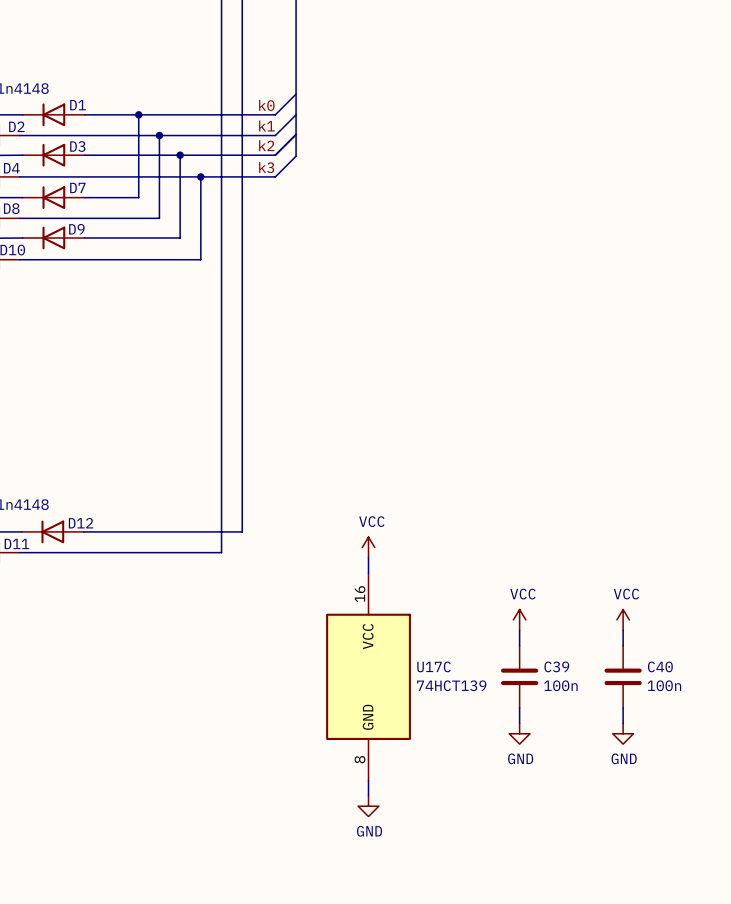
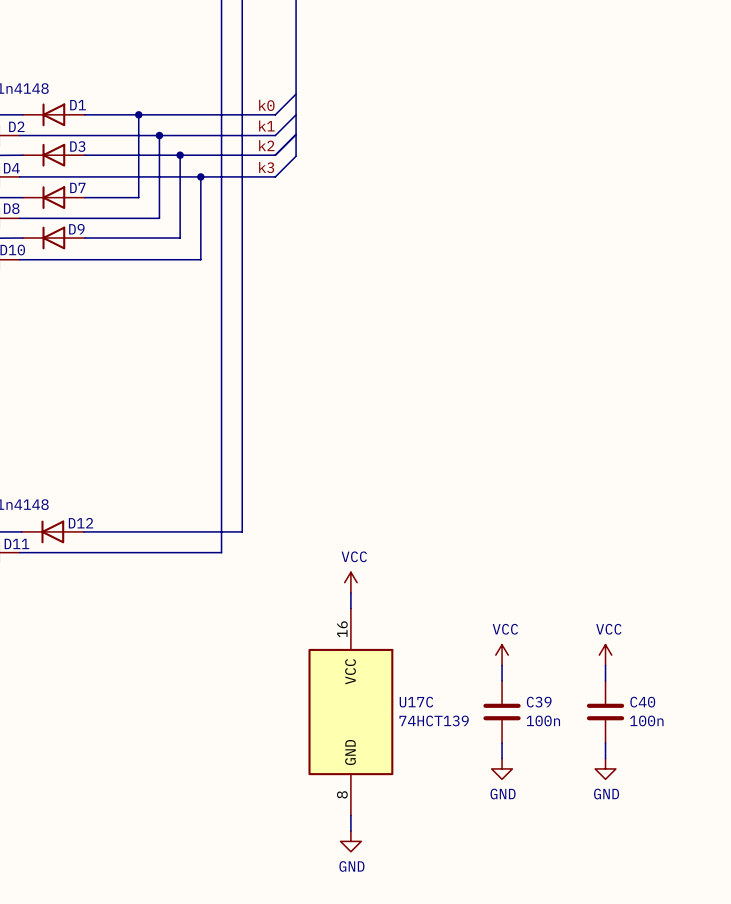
power symbol position: VCC (368, 547) -> VCC (350, 582)
wire: (368, 557) (368, 573) -> (350, 593) (350, 608)
power symbol position: VCC (519, 619) -> VCC (502, 655)
power symbol position: VCC (623, 619) -> VCC (605, 655)
wire: (519, 630) (519, 645) -> (502, 665) (502, 680)
wire: (623, 630) (623, 645) -> (605, 665) (605, 680)
U17C position: (368, 676) -> (350, 712)
C39 position: (519, 676) -> (502, 712)
C40 position: (623, 676) -> (605, 712)
wire: (519, 707) (519, 723) -> (502, 743) (502, 758)
wire: (623, 707) (623, 723) -> (605, 743) (605, 758)
power symbol position: GND (519, 733) -> GND (502, 768)
power symbol position: GND (623, 733) -> GND (605, 768)
wire: (368, 780) (368, 795) -> (350, 815) (350, 831)
power symbol position: GND (368, 806) -> GND (350, 841)

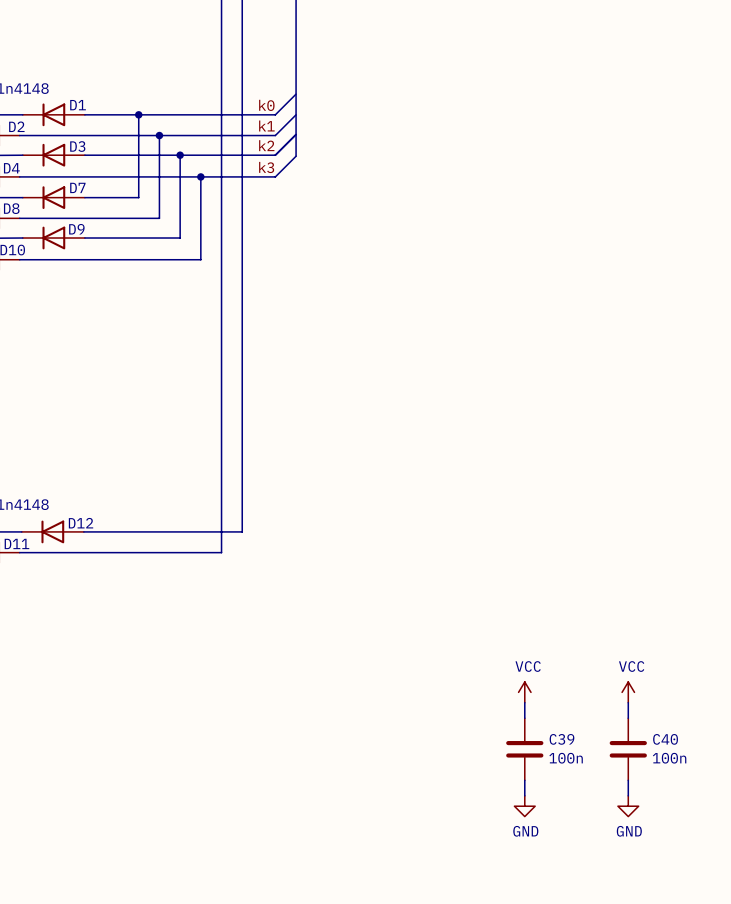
power symbol: VCC (350, 582) -> none
wire: (350, 593) (350, 608) -> none
power symbol position: VCC (502, 655) -> VCC (524, 692)
power symbol position: VCC (605, 655) -> VCC (628, 692)
wire: (502, 665) (502, 680) -> (524, 702) (524, 718)
wire: (605, 665) (605, 680) -> (628, 702) (628, 718)
U17C: 74HCT139 (350, 712) -> none
C39 position: (502, 712) -> (524, 749)
C40 position: (605, 712) -> (628, 749)
wire: (502, 743) (502, 758) -> (524, 780) (524, 795)
wire: (605, 743) (605, 758) -> (628, 780) (628, 795)
power symbol position: GND (502, 768) -> GND (524, 806)
power symbol position: GND (605, 768) -> GND (628, 806)
wire: (350, 815) (350, 831) -> none
power symbol: GND (350, 841) -> none

